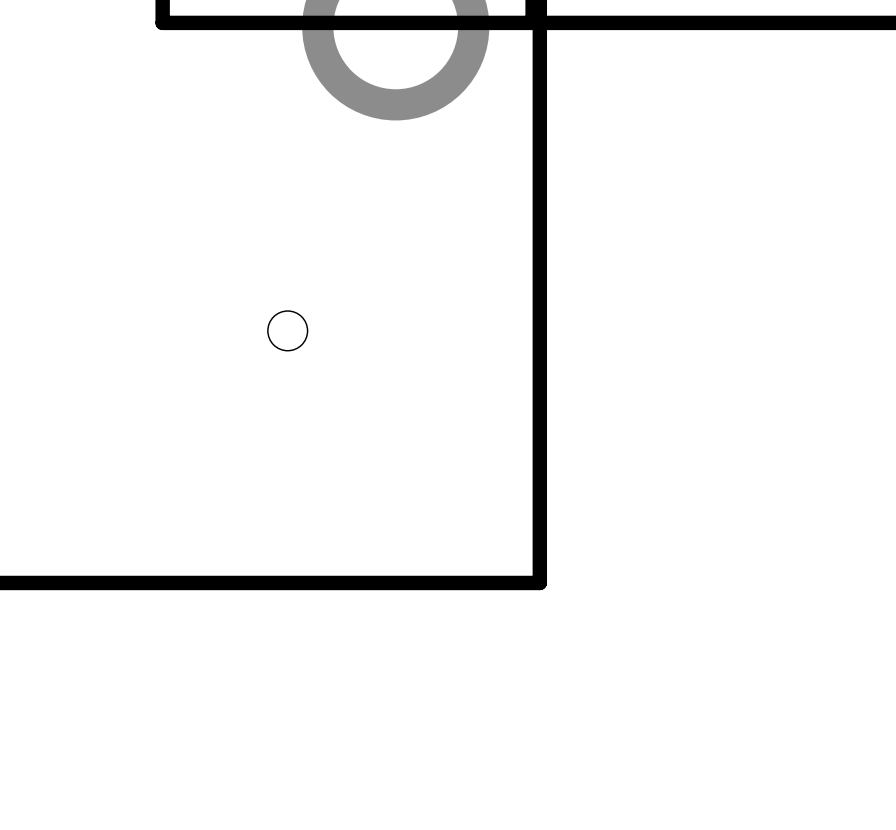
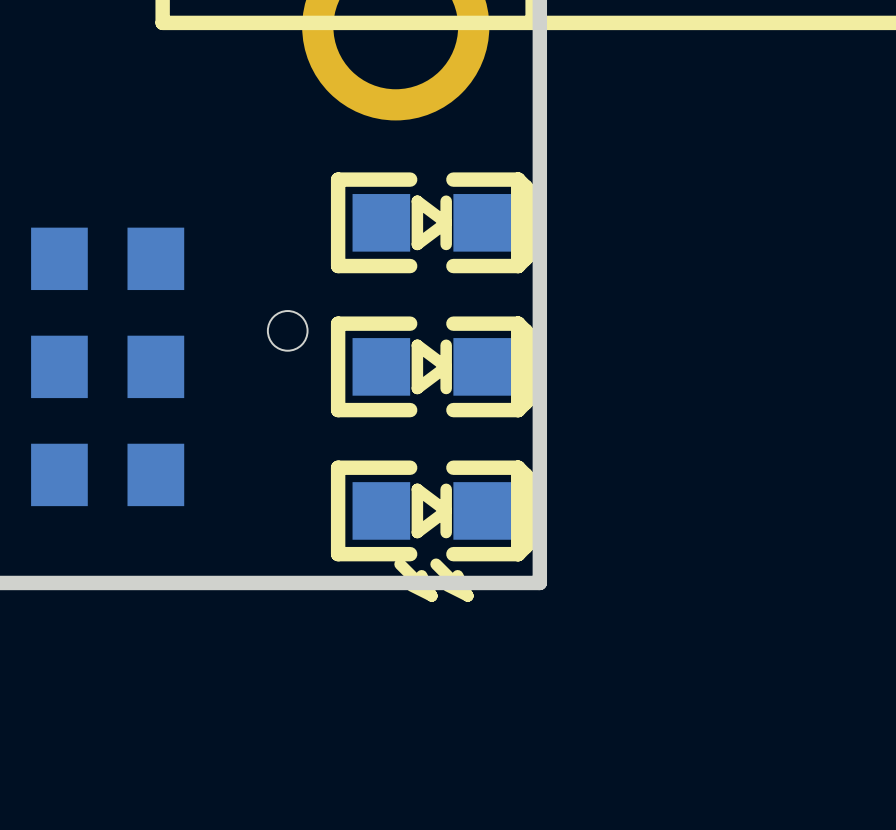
part: none -> (435, 222)
part: none -> (107, 258)
part: none -> (107, 366)
part: none -> (435, 366)
part: none -> (107, 474)
part: none -> (435, 531)

